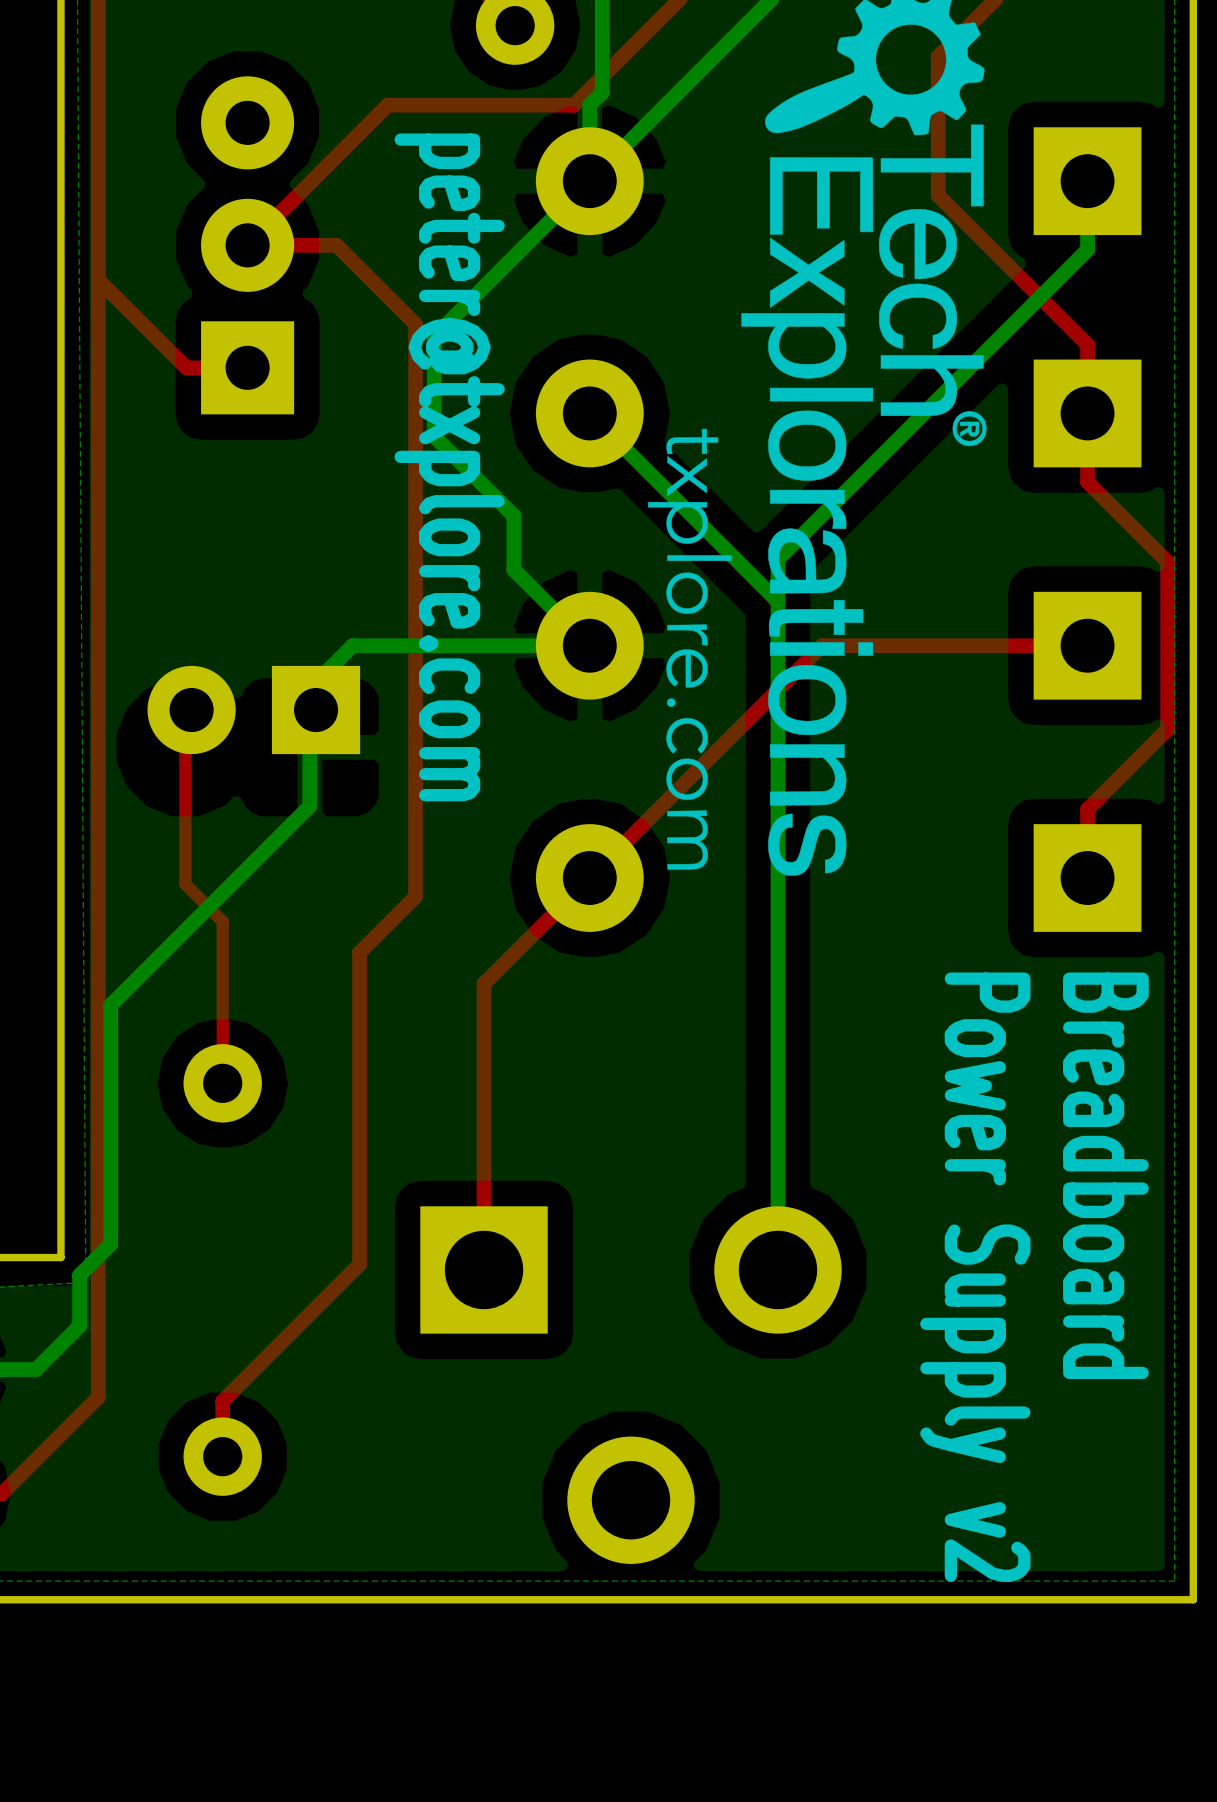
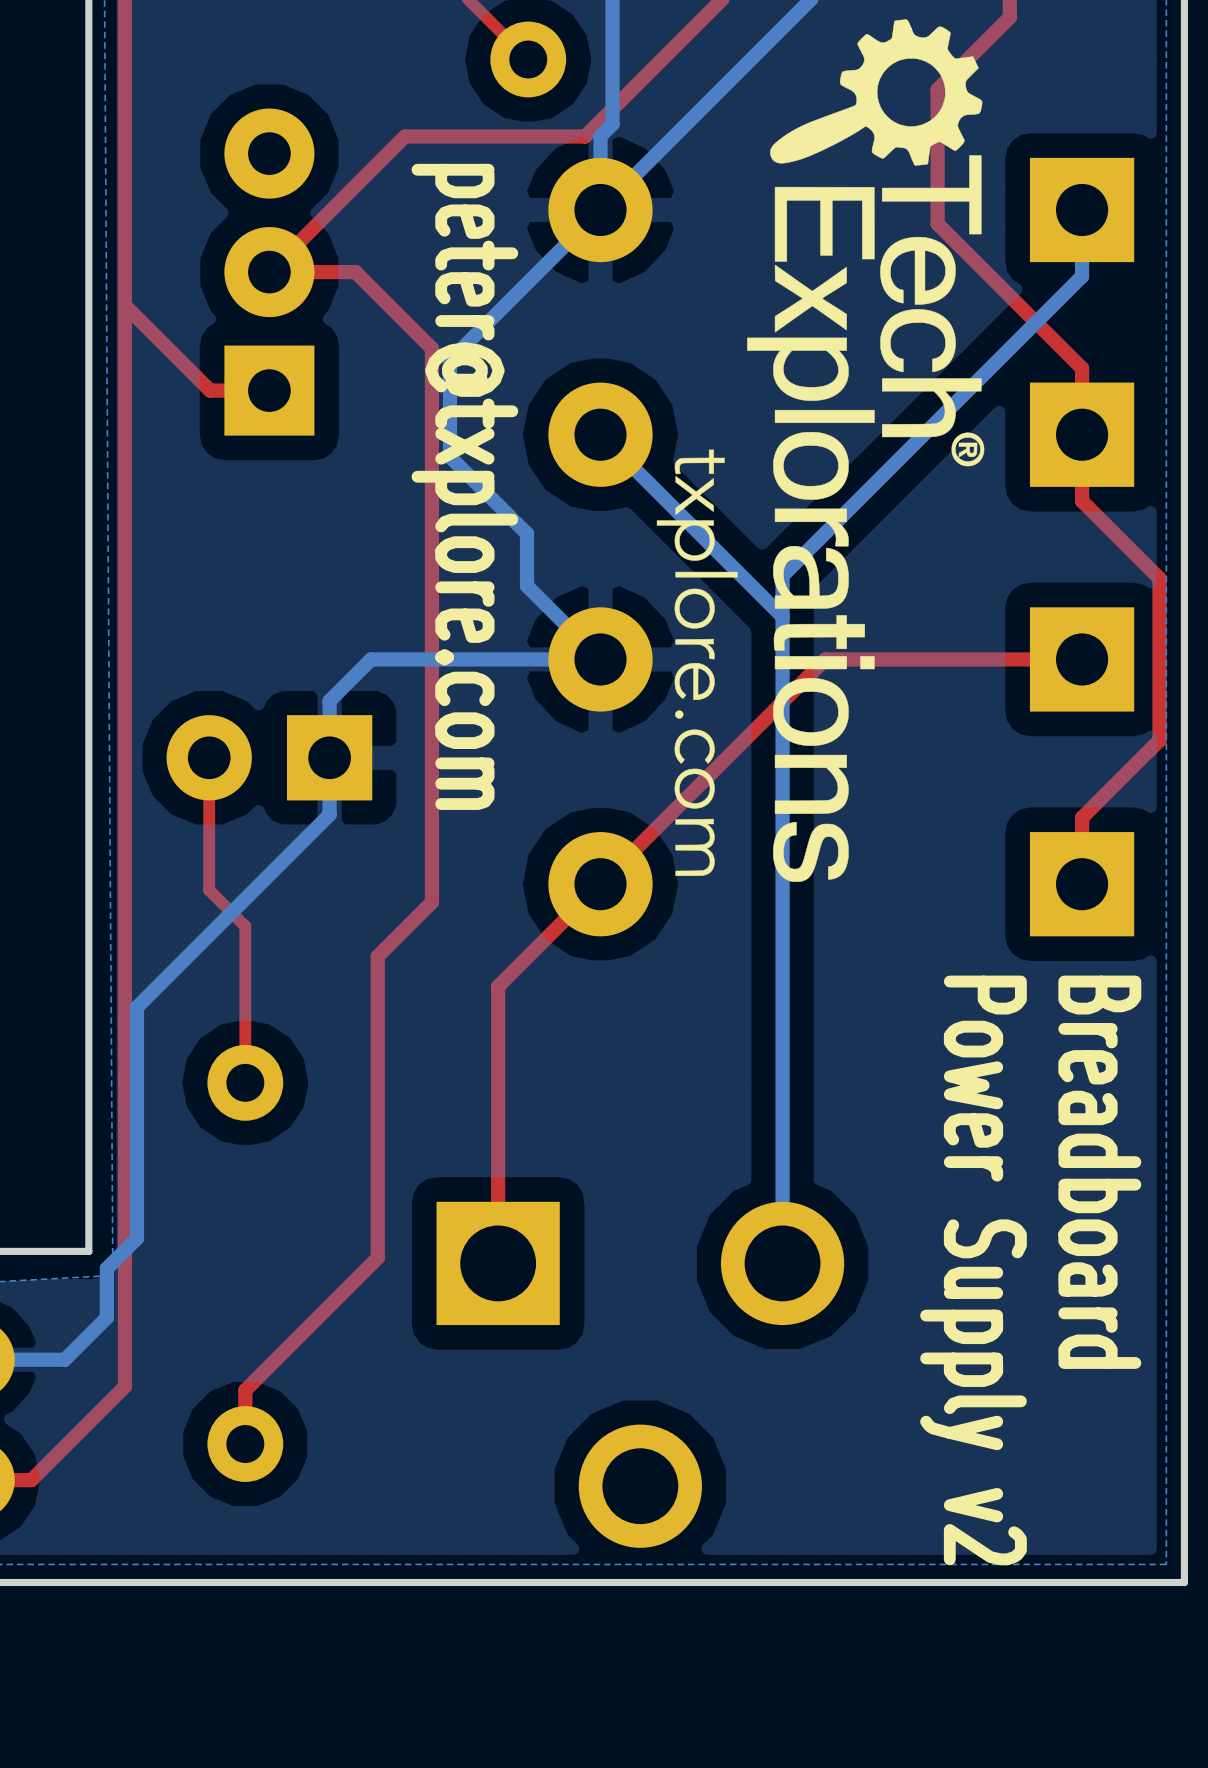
part position: (253, 710) -> (269, 757)

